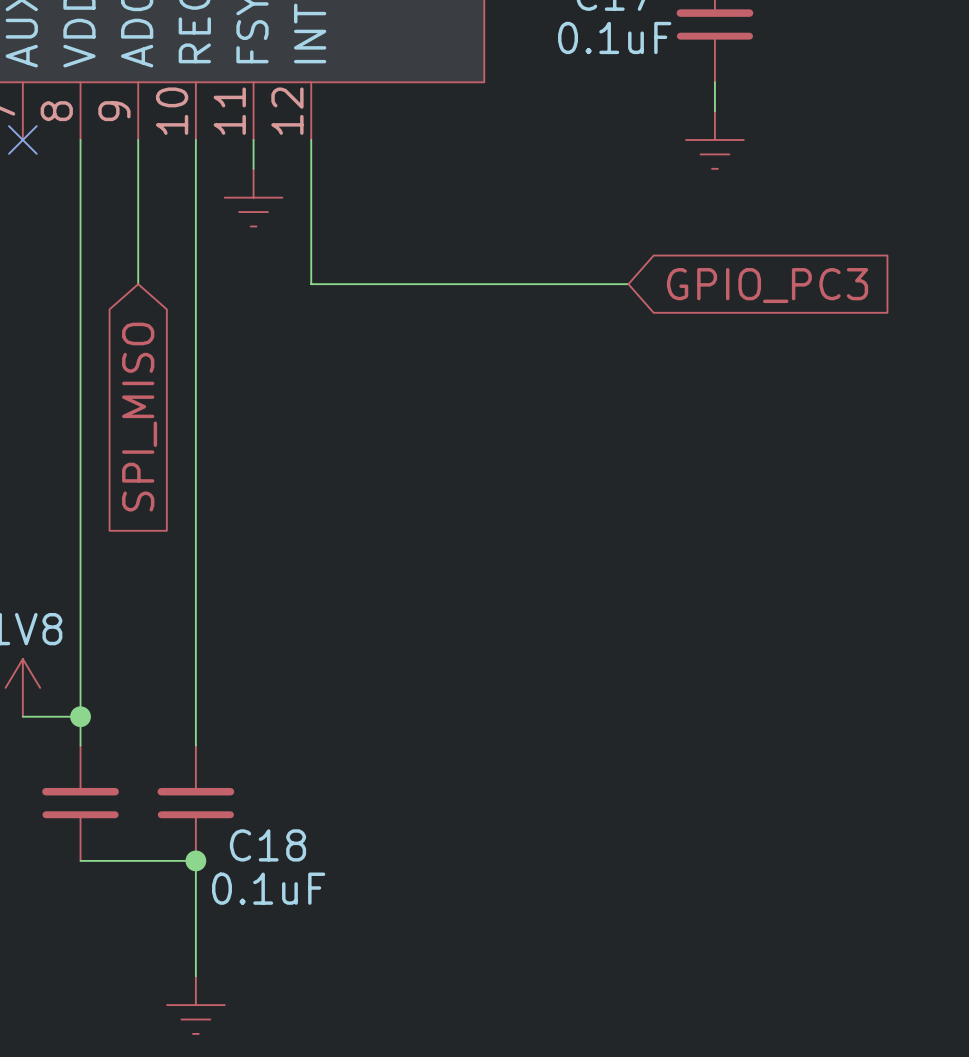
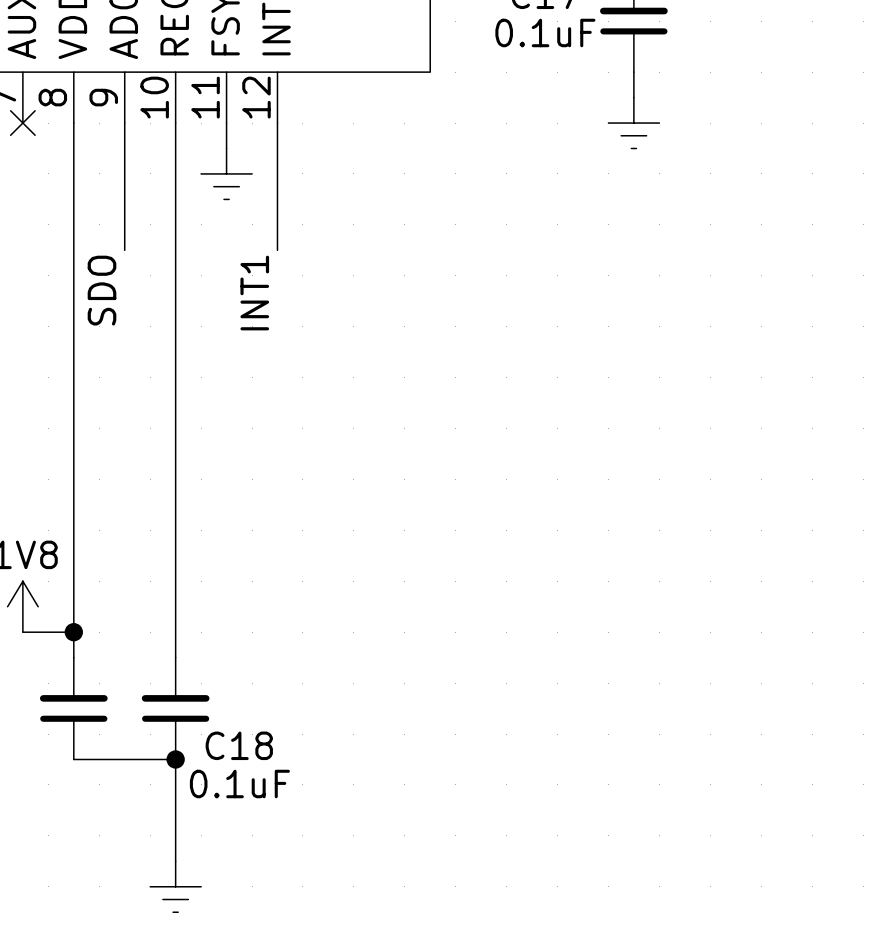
wire: (311, 284) (628, 284) -> none
global label: GPIO_PC3 (767, 285) -> none
label: none -> SDO (102, 290)
label: none -> INT1 (254, 293)
global label: SPI_MISO (139, 417) -> none

